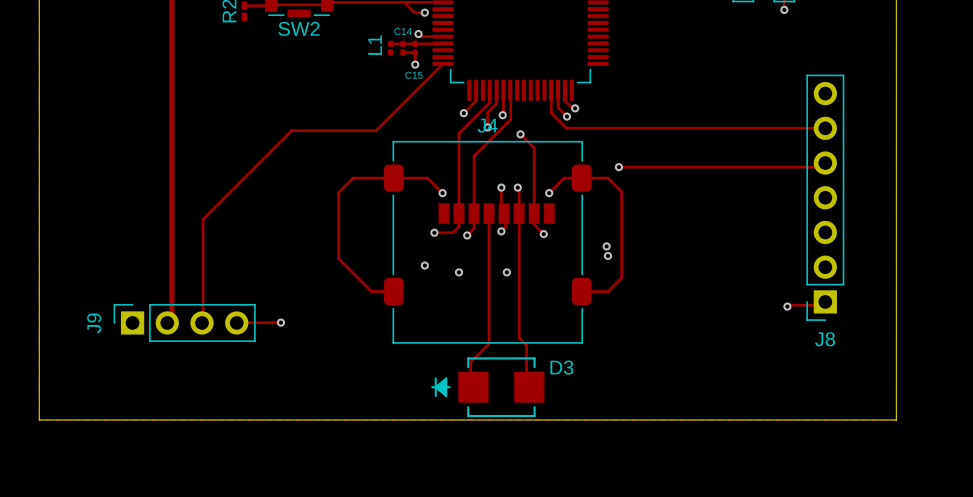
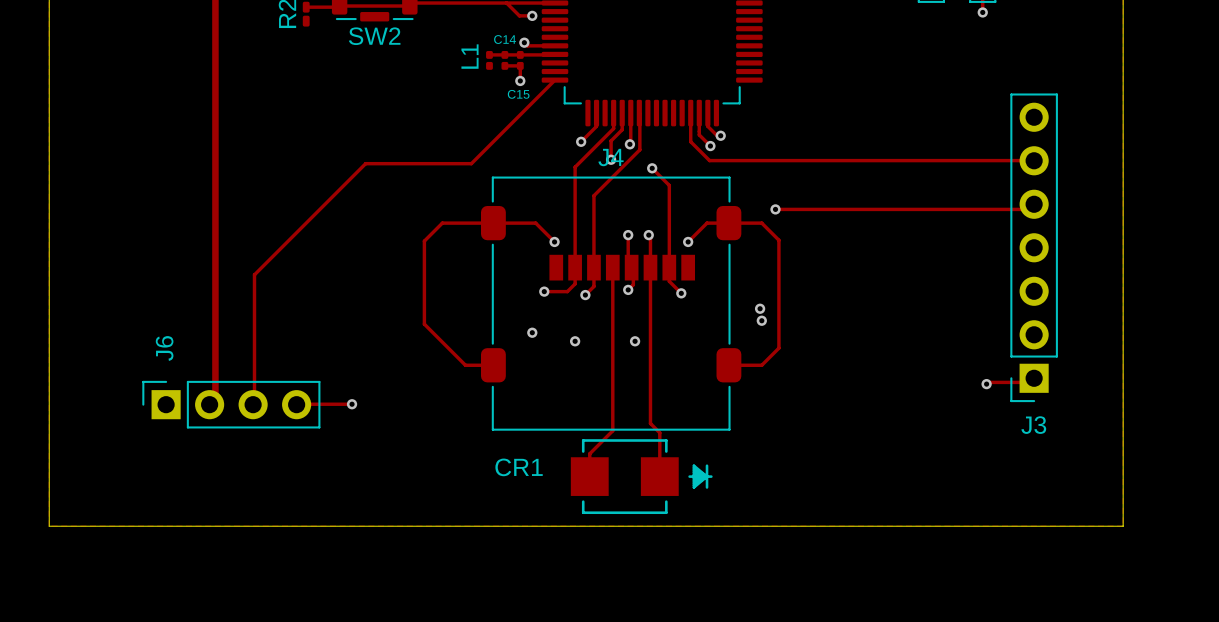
J9 name: J9 (94, 323) -> J6 (164, 348)
J8 name: J8 (825, 339) -> J3 (1033, 425)
CR1: none -> (641, 476)
D3: (487, 387) -> none

